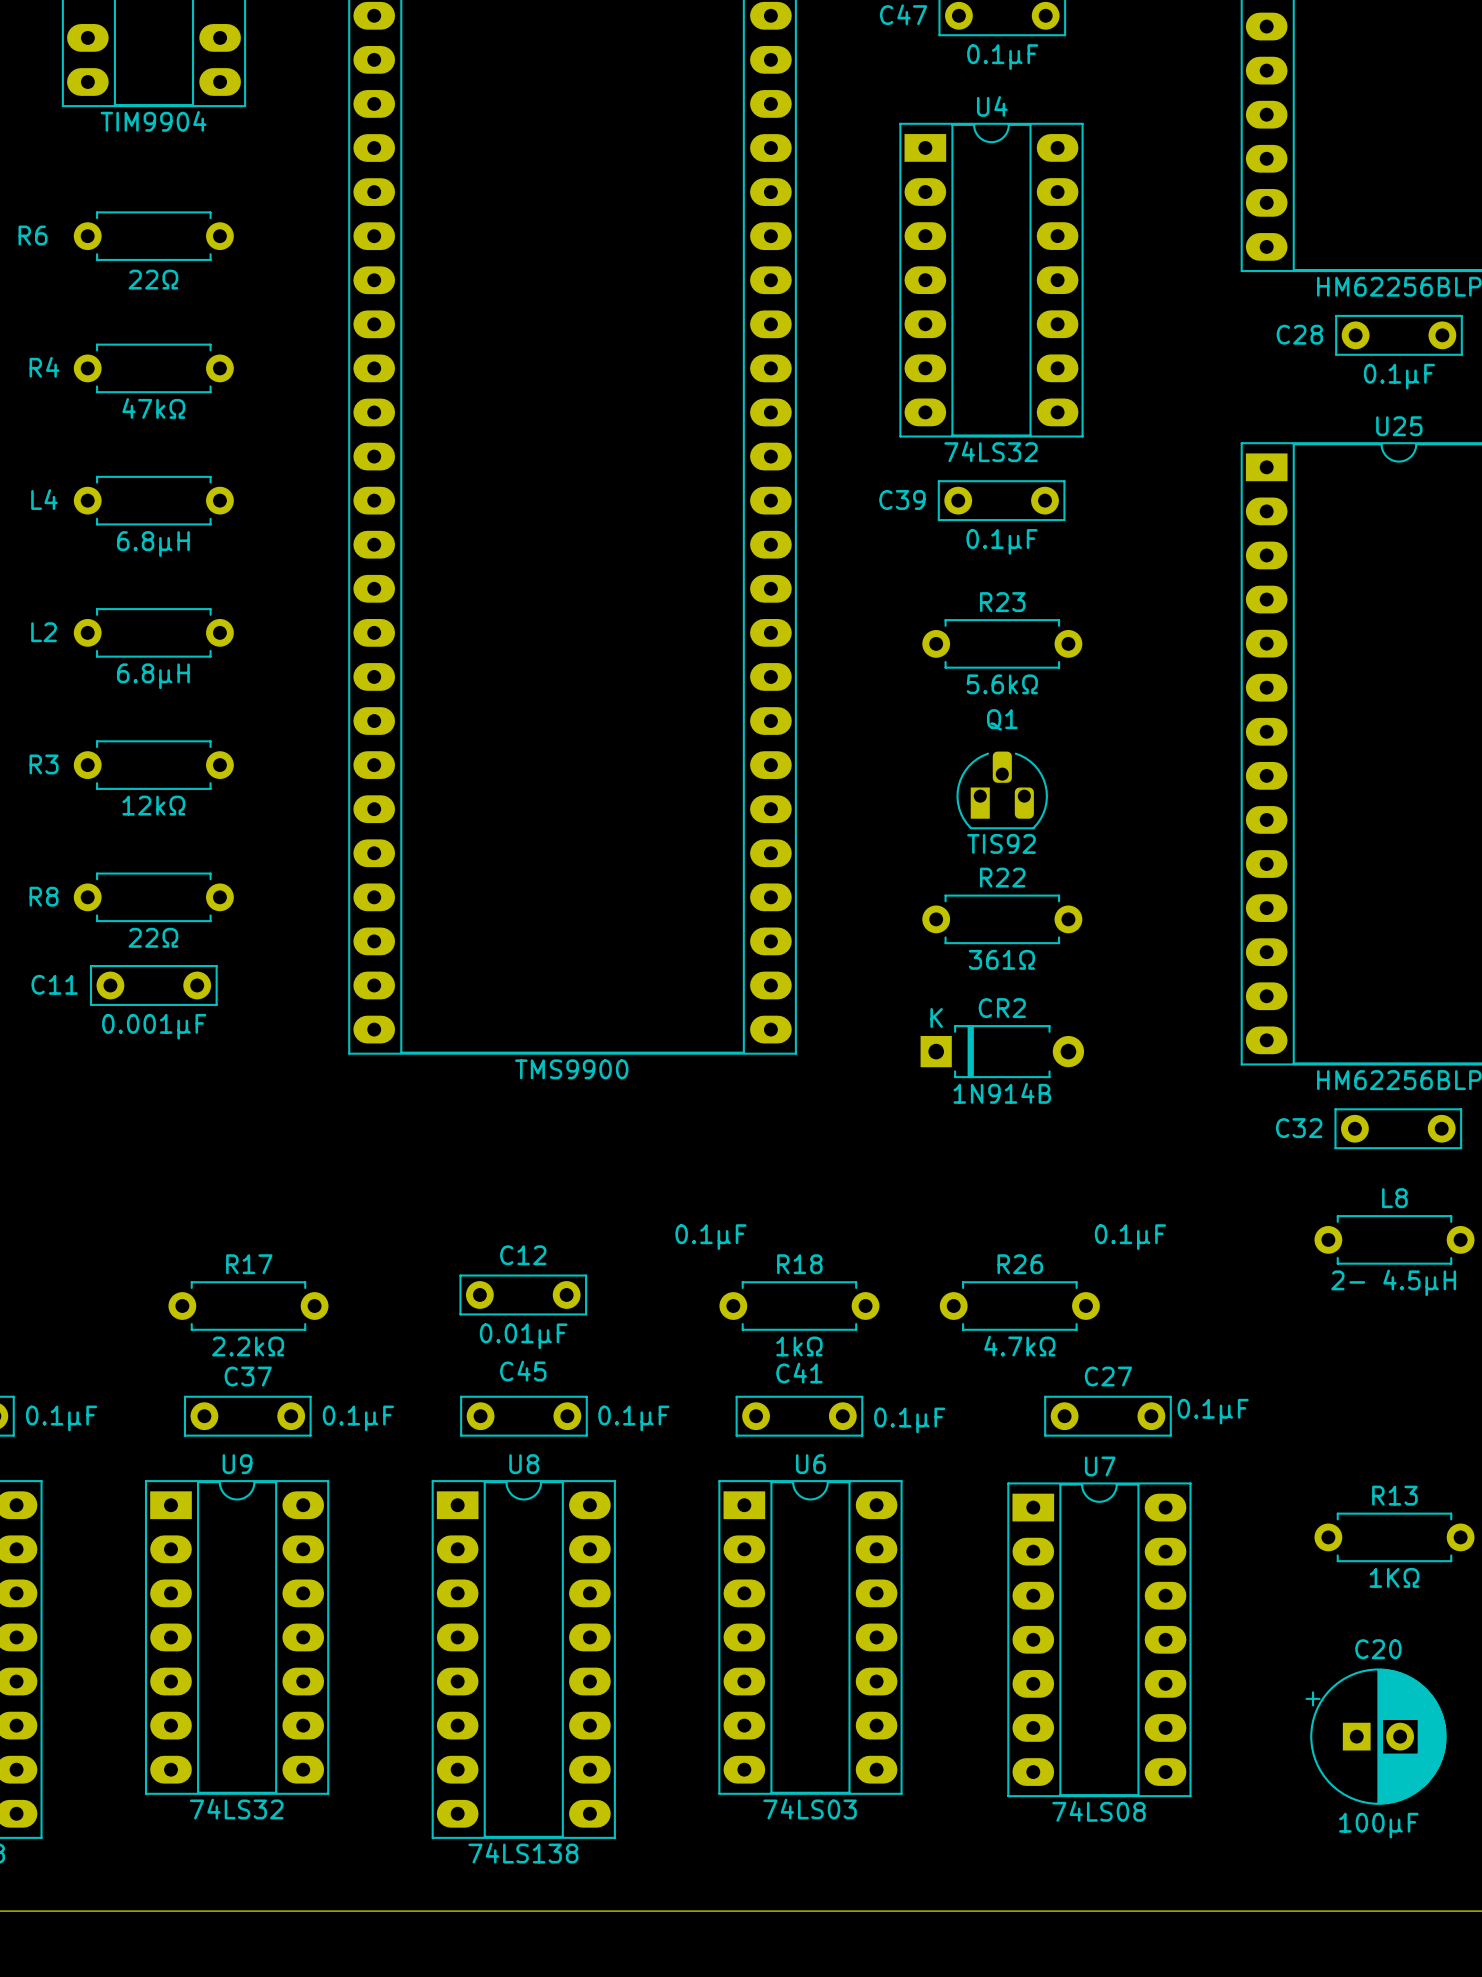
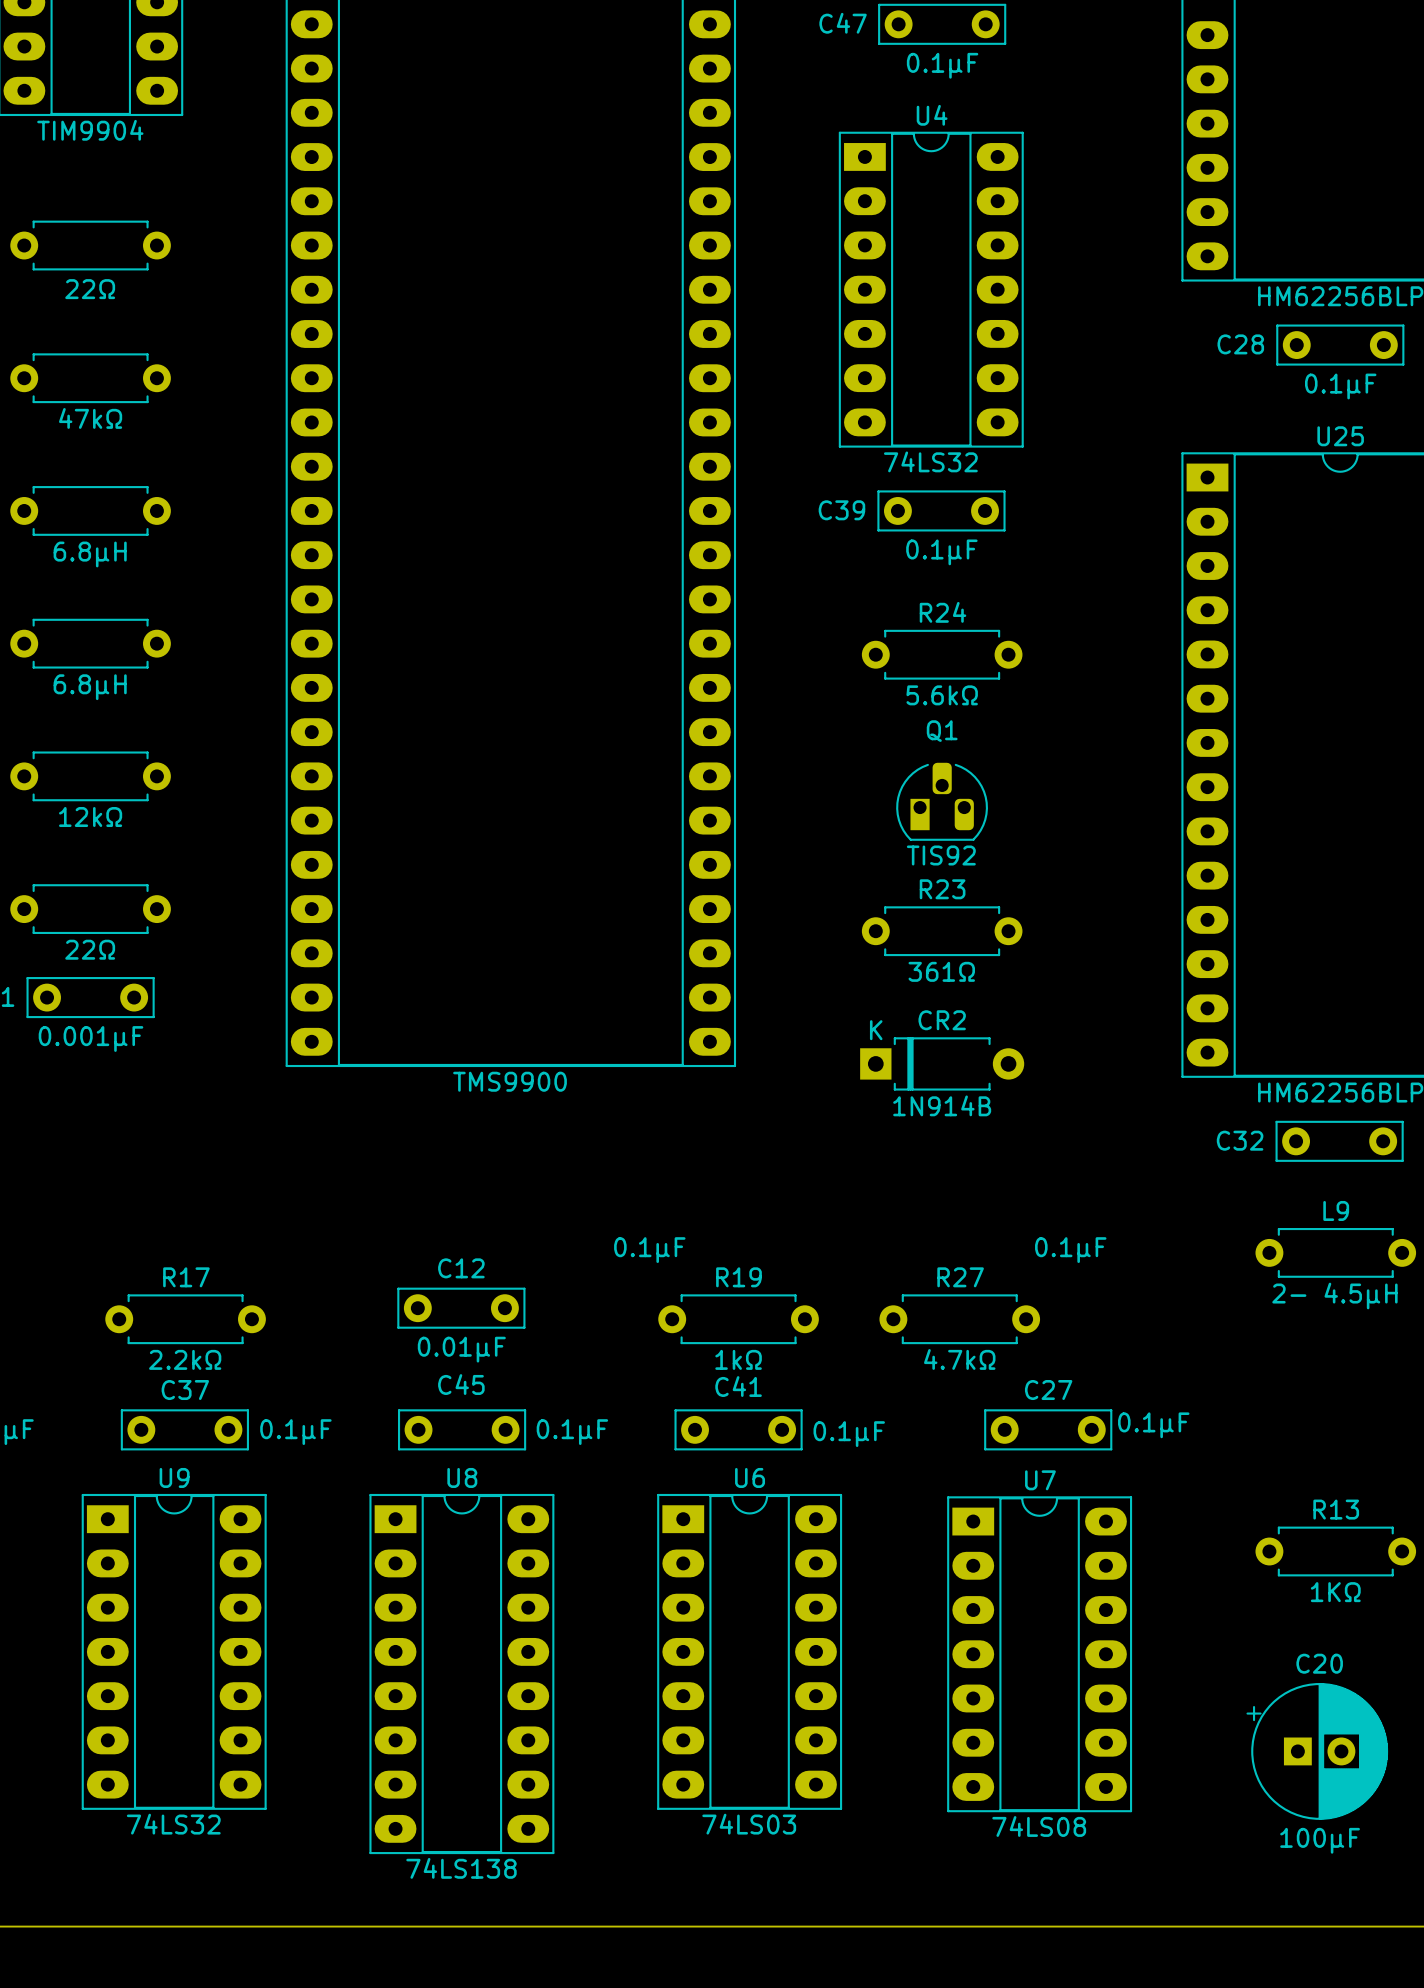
R23 name: R23 (1002, 602) -> R24 (943, 612)
R22 name: R22 (1002, 877) -> R23 (942, 889)
L8 name: L8 (1394, 1198) -> L9 (1336, 1210)
R18 name: R18 (799, 1264) -> R19 (738, 1277)
R26 name: R26 (1020, 1264) -> R27 (960, 1277)

